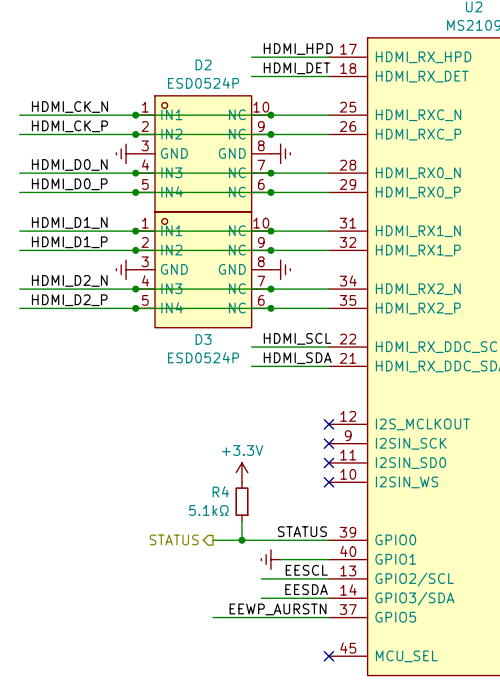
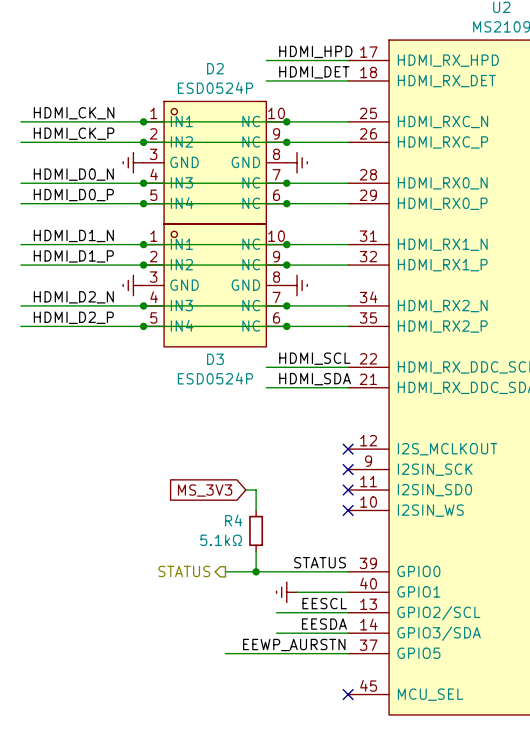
global label: none -> MS_3V3 (205, 490)
power symbol: +3.3V (241, 472) -> none

